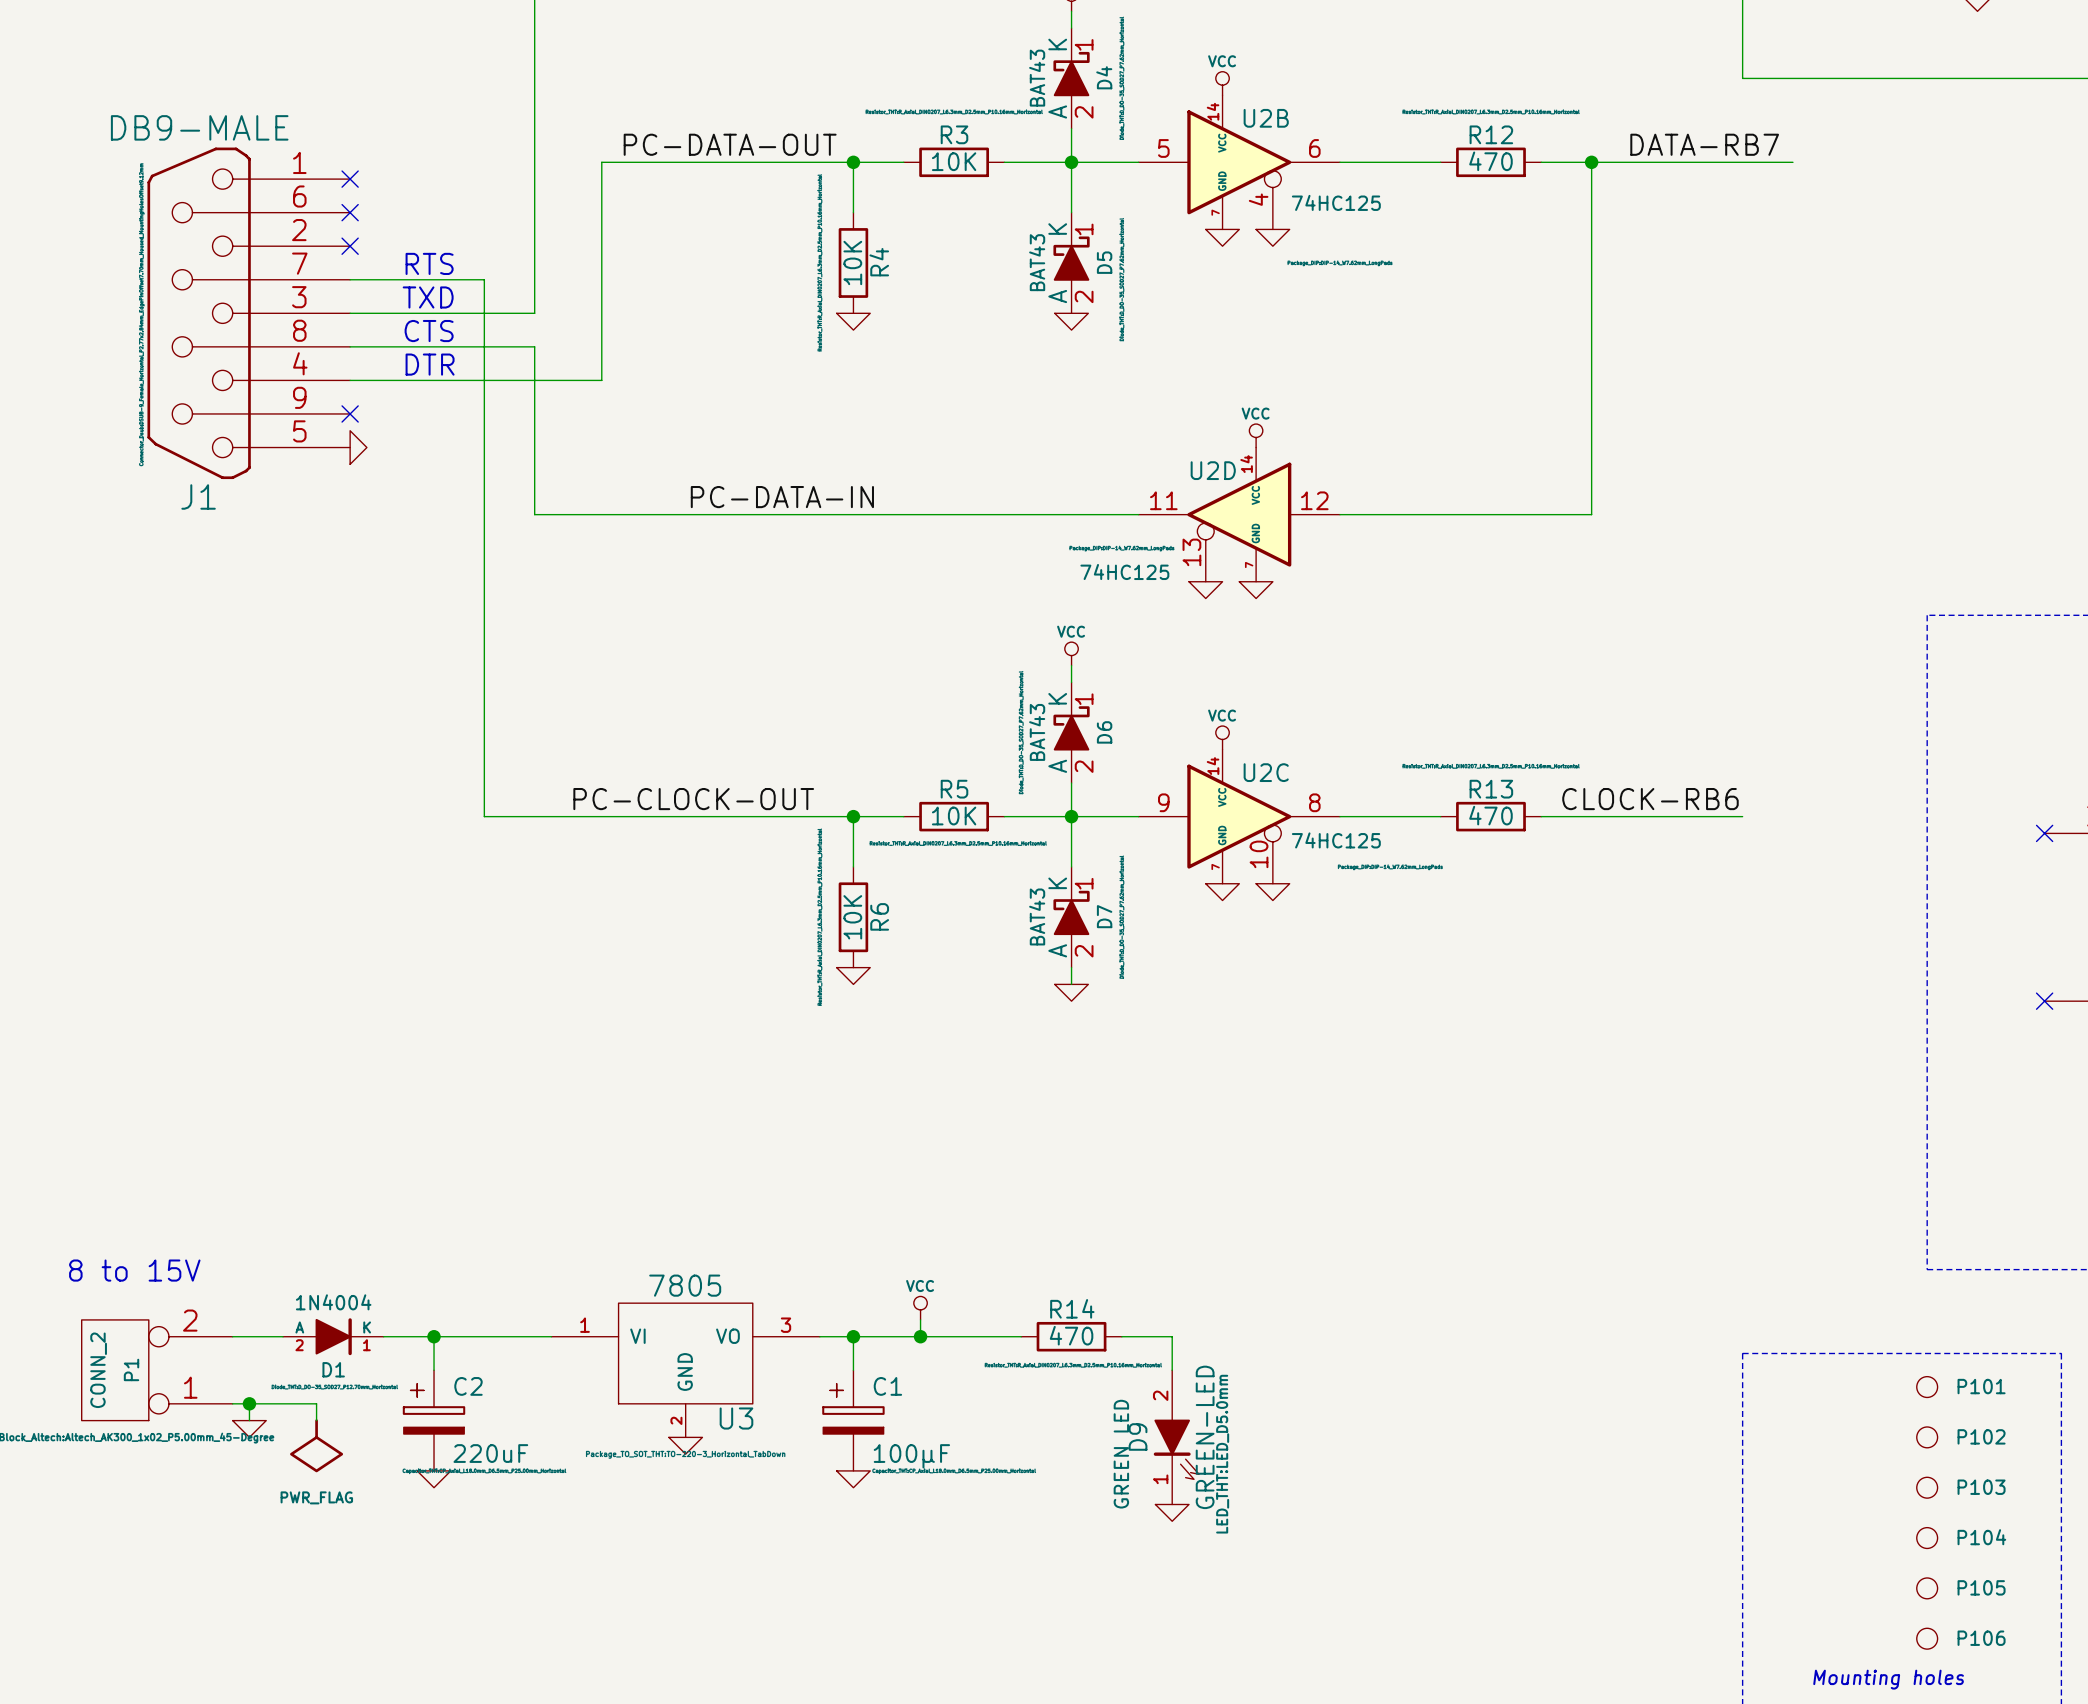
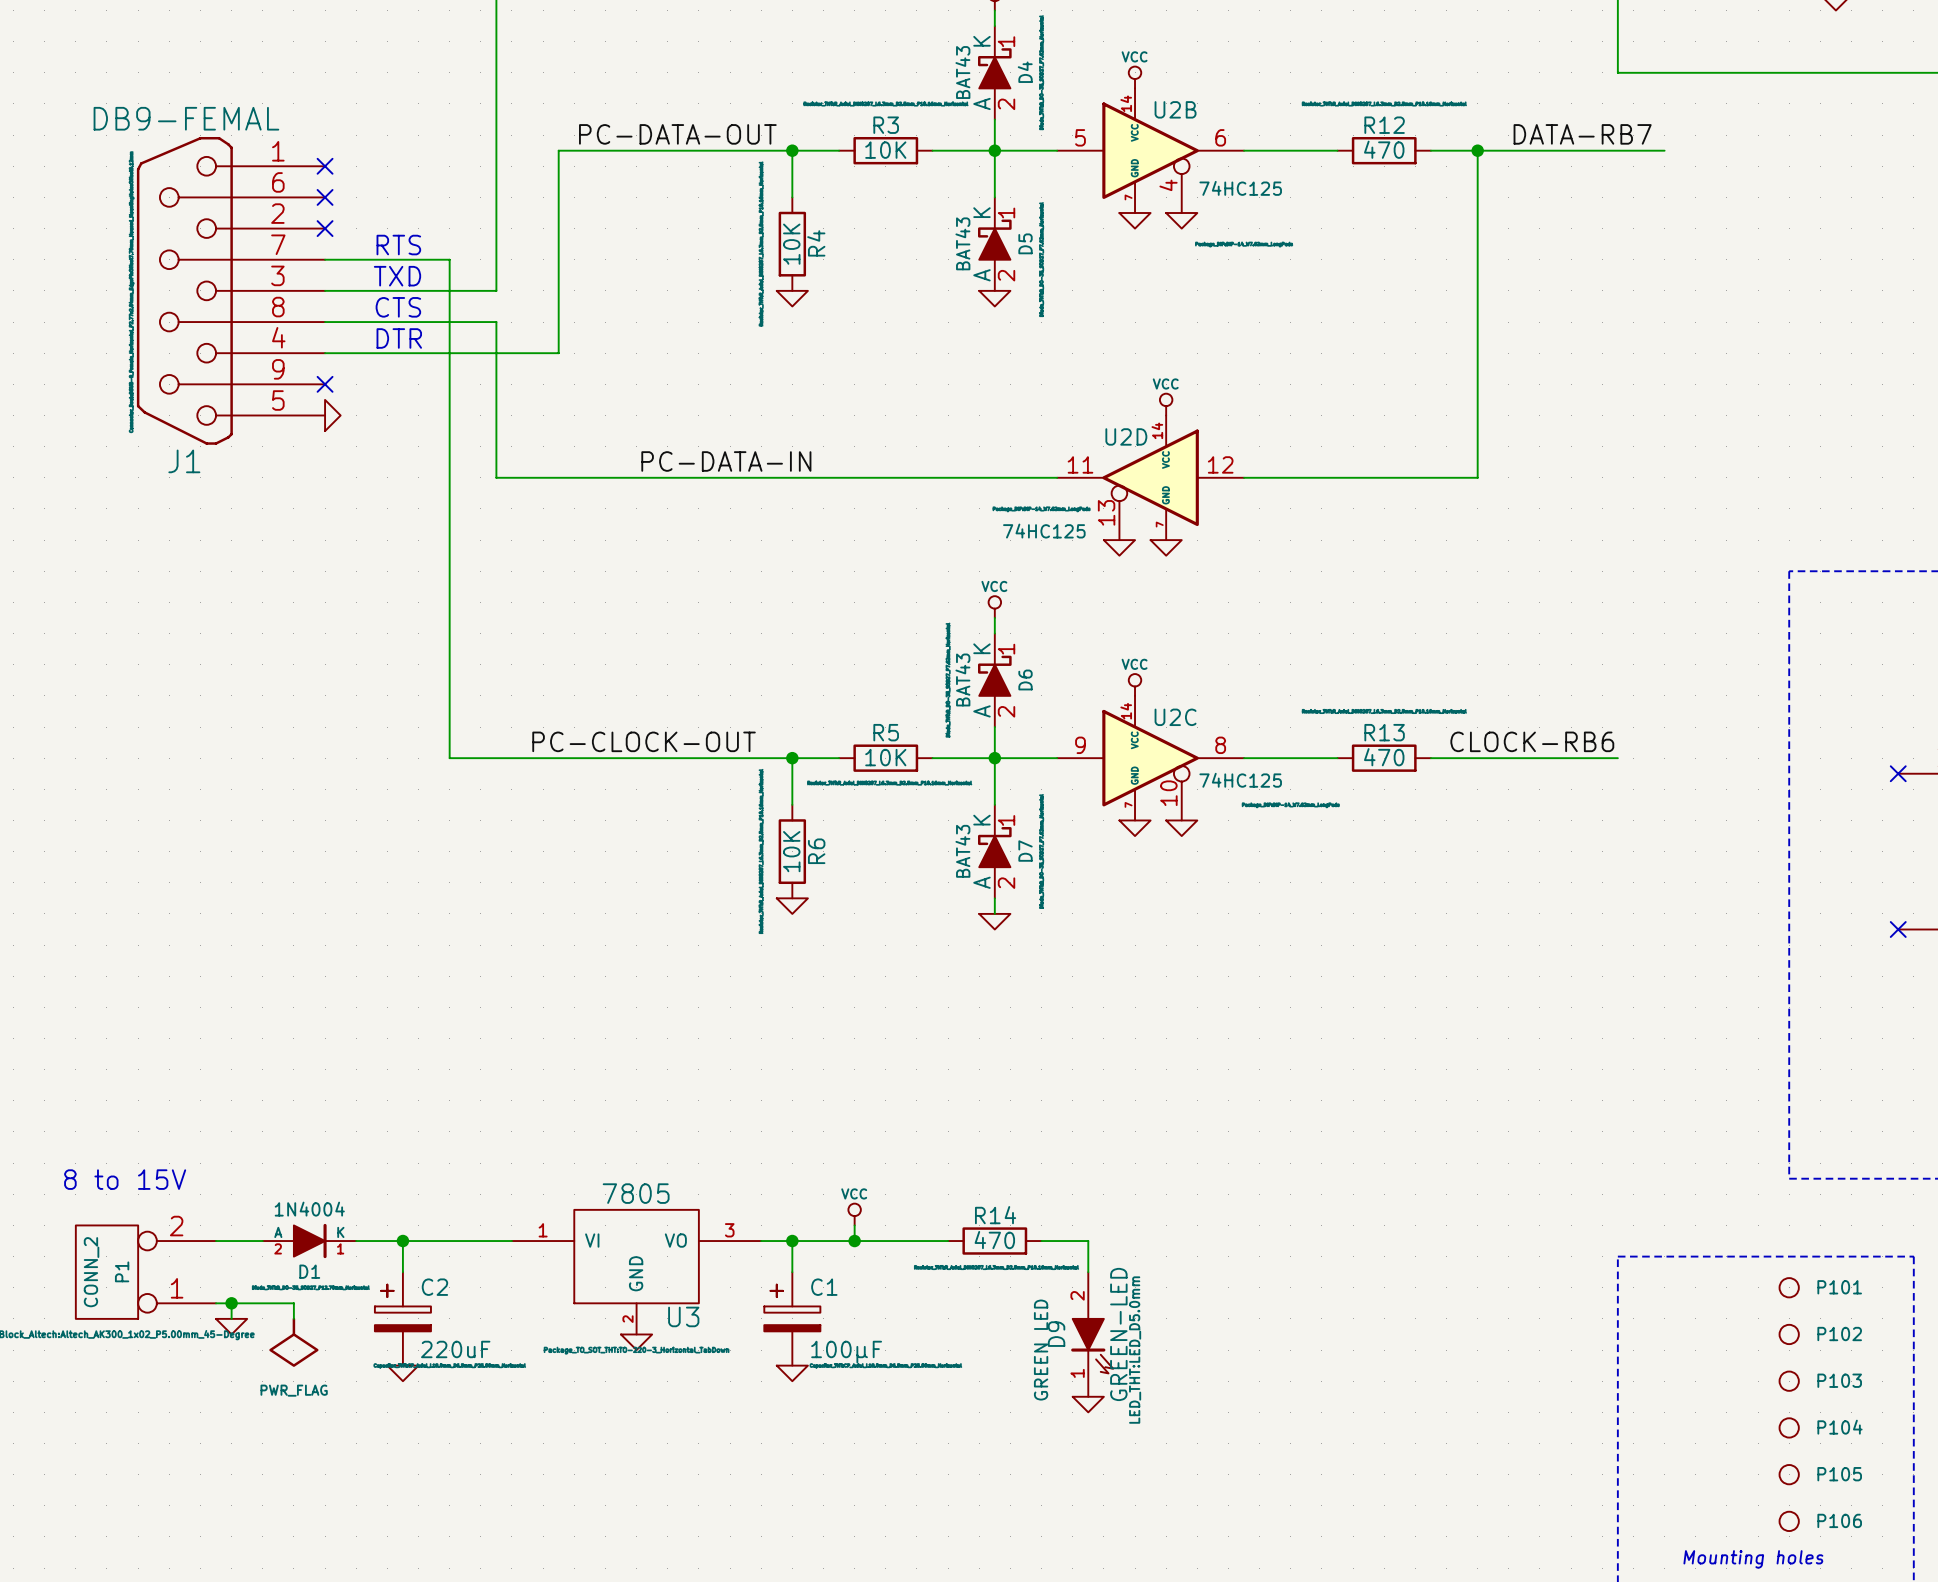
J1 value: DB9-MALE (199, 127) -> DB9-FEMAL (186, 118)

